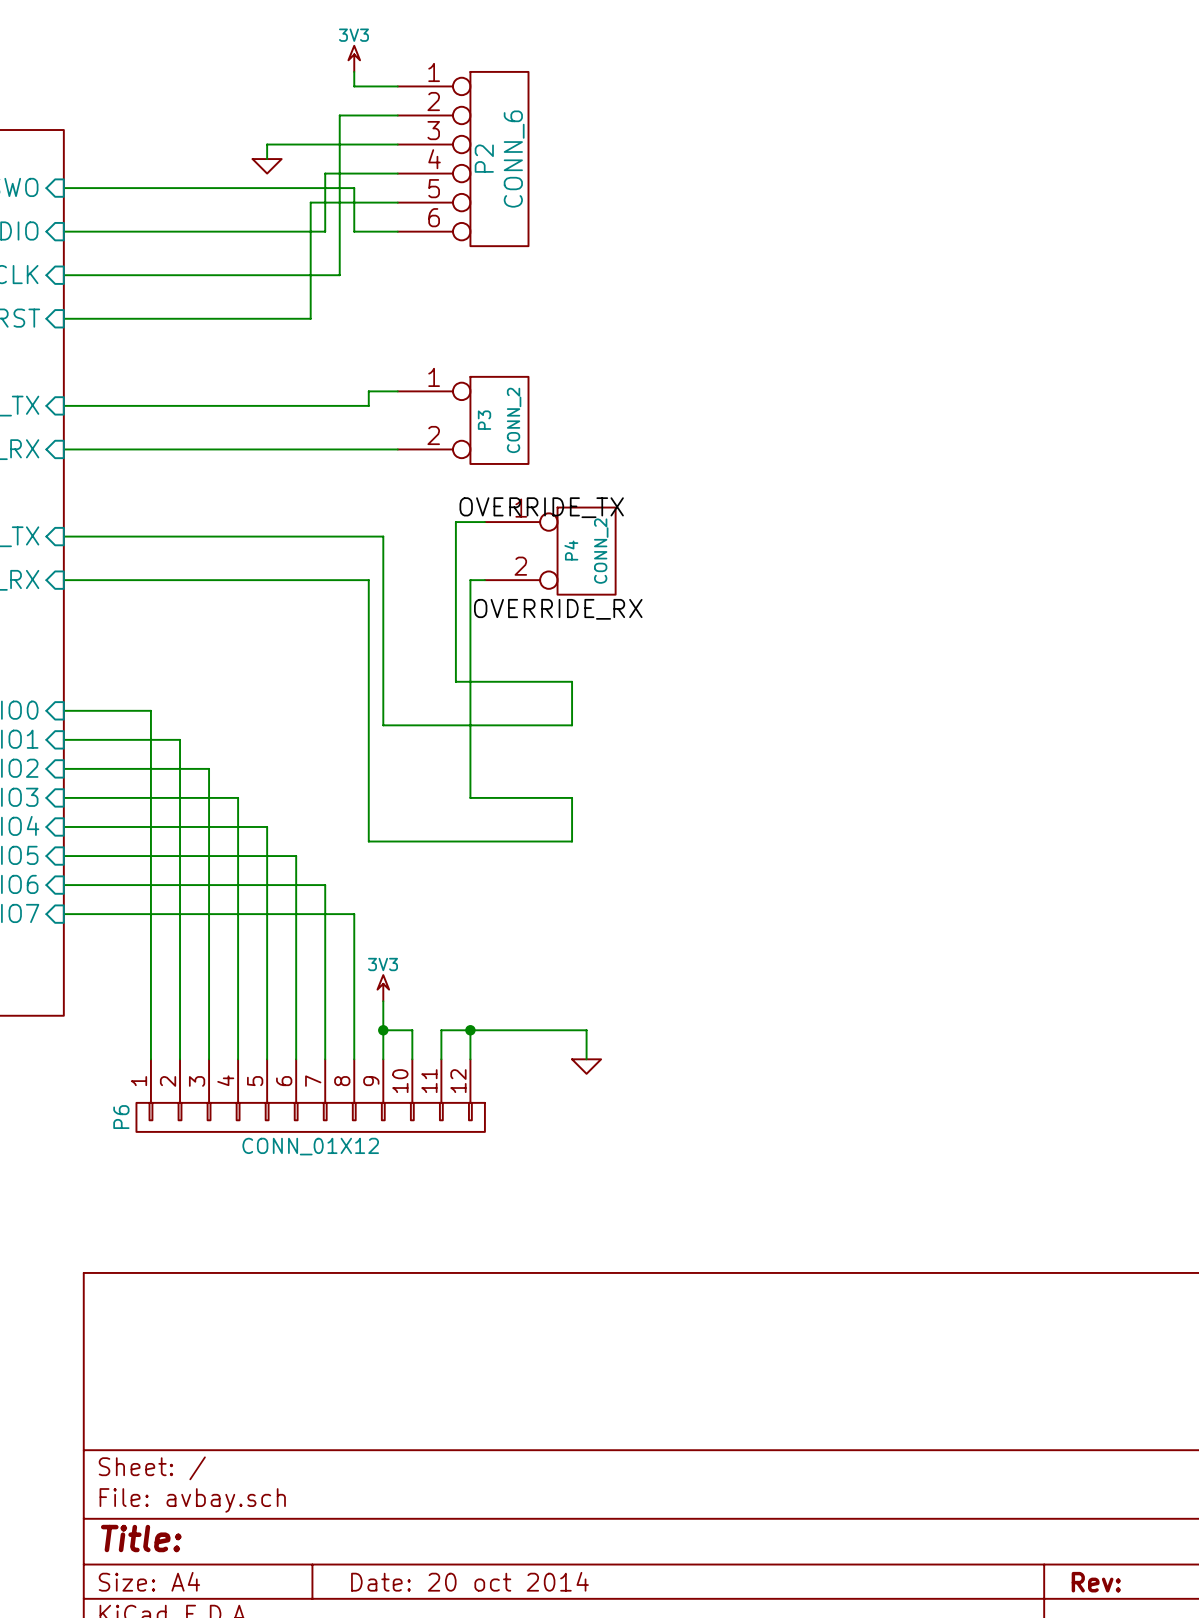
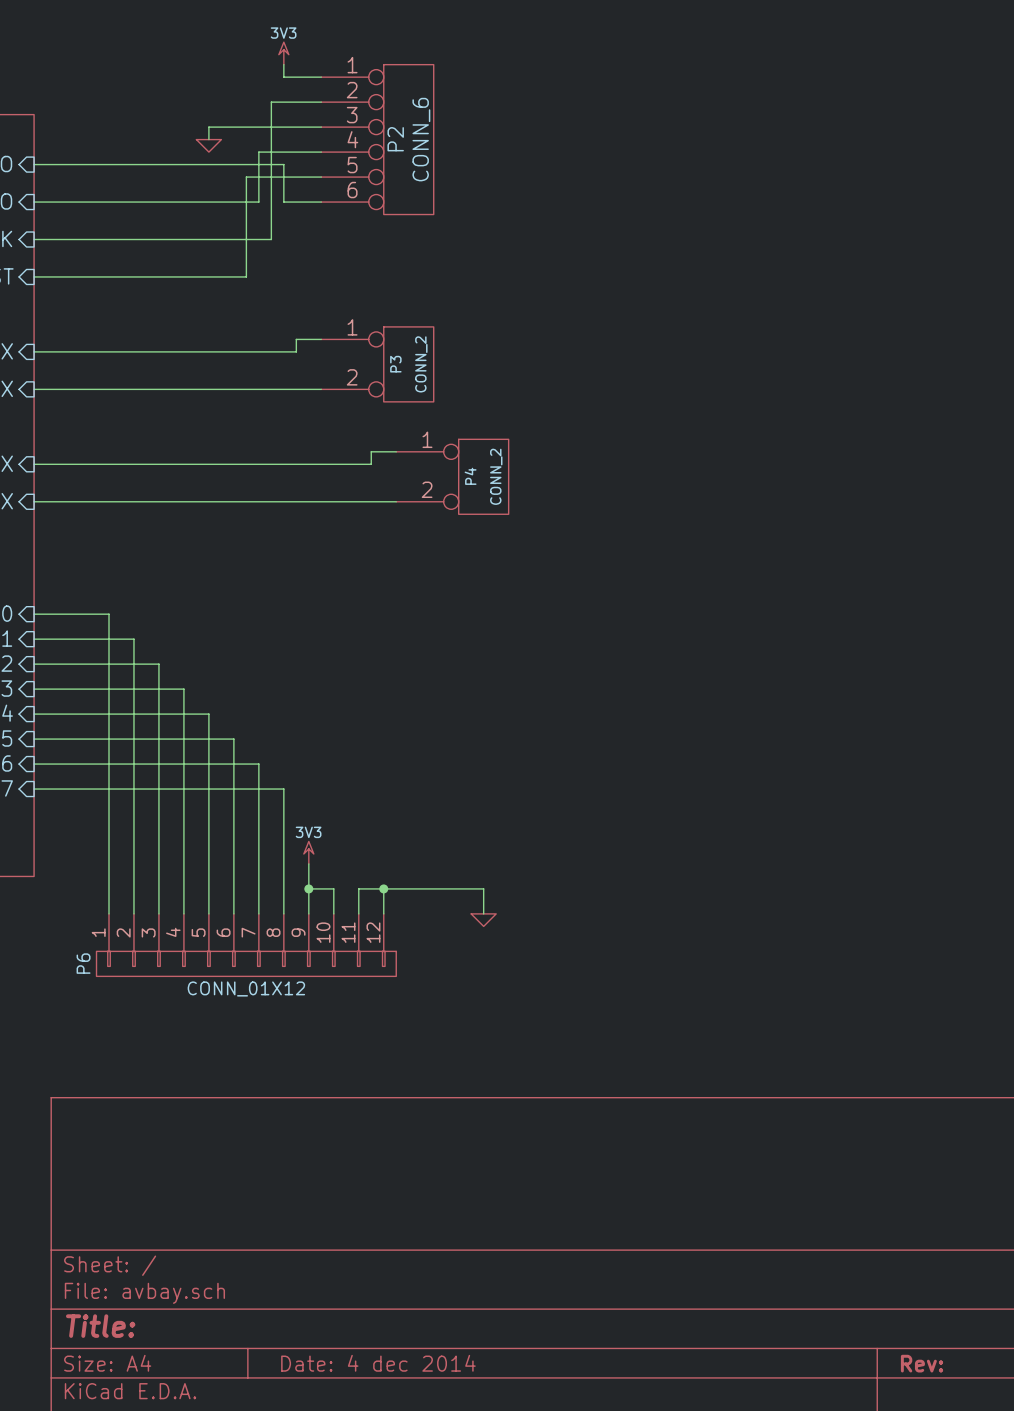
label: OVERRIDE_TX (541, 507) -> none
wire: (383, 536) (383, 725) (572, 725) (572, 681) (455, 681) (455, 536) -> (308, 464) (371, 464)
wire: (368, 580) (368, 841) (572, 841) (572, 797) (470, 797) (470, 580) -> (296, 501) (383, 501)
label: OVERRIDE_RX (558, 609) -> none
title block: Date: 20 oct 2014 (469, 1581) -> Date: 4 dec 2014 (378, 1363)

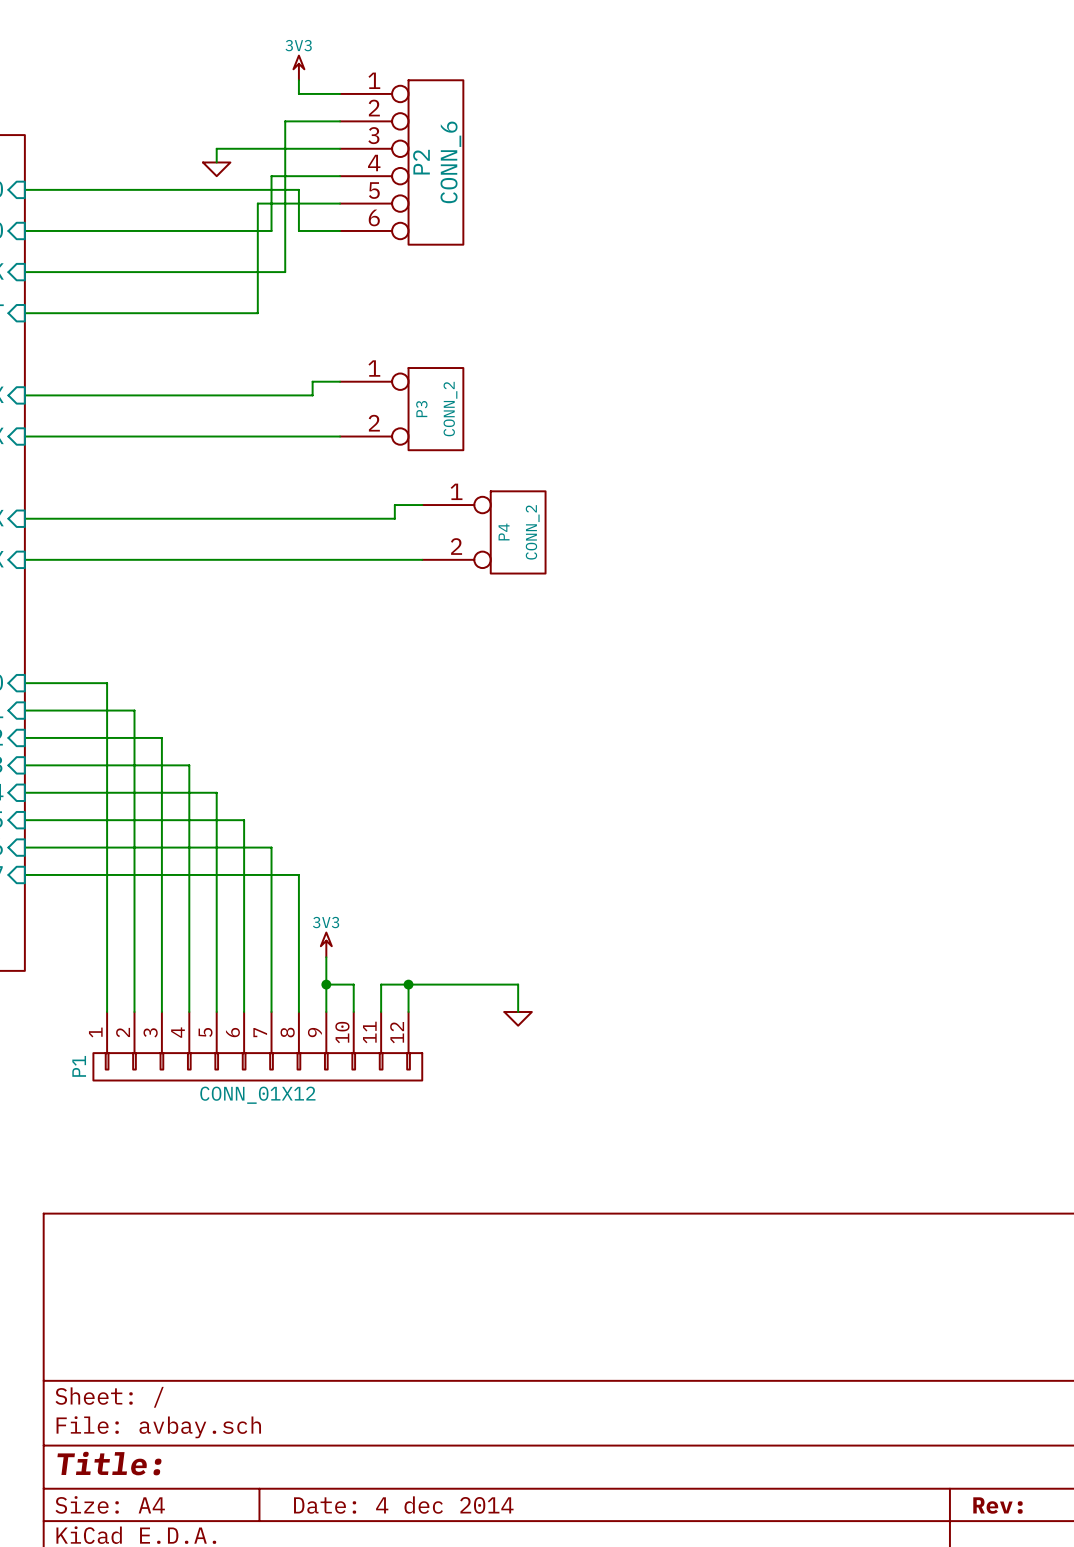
P6 name: P6 (83, 963) -> P1 (79, 1066)

